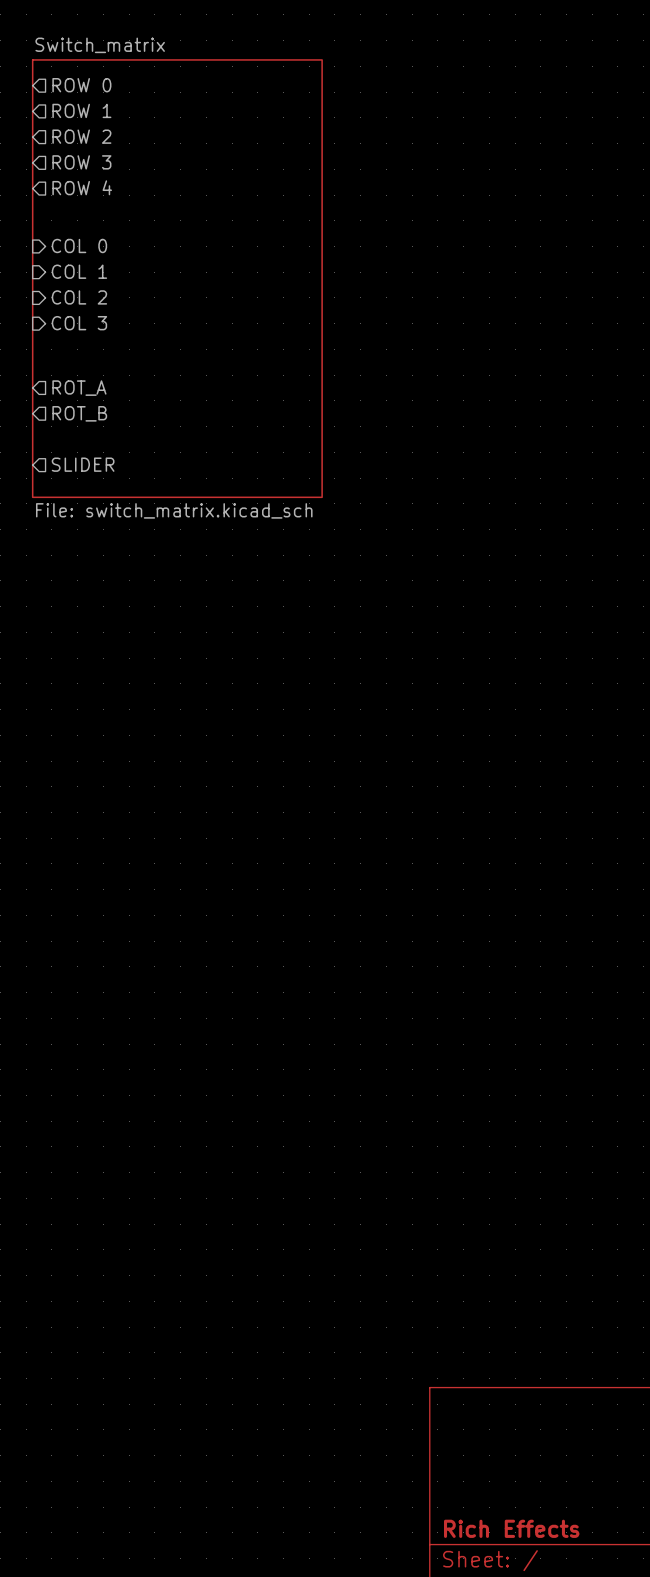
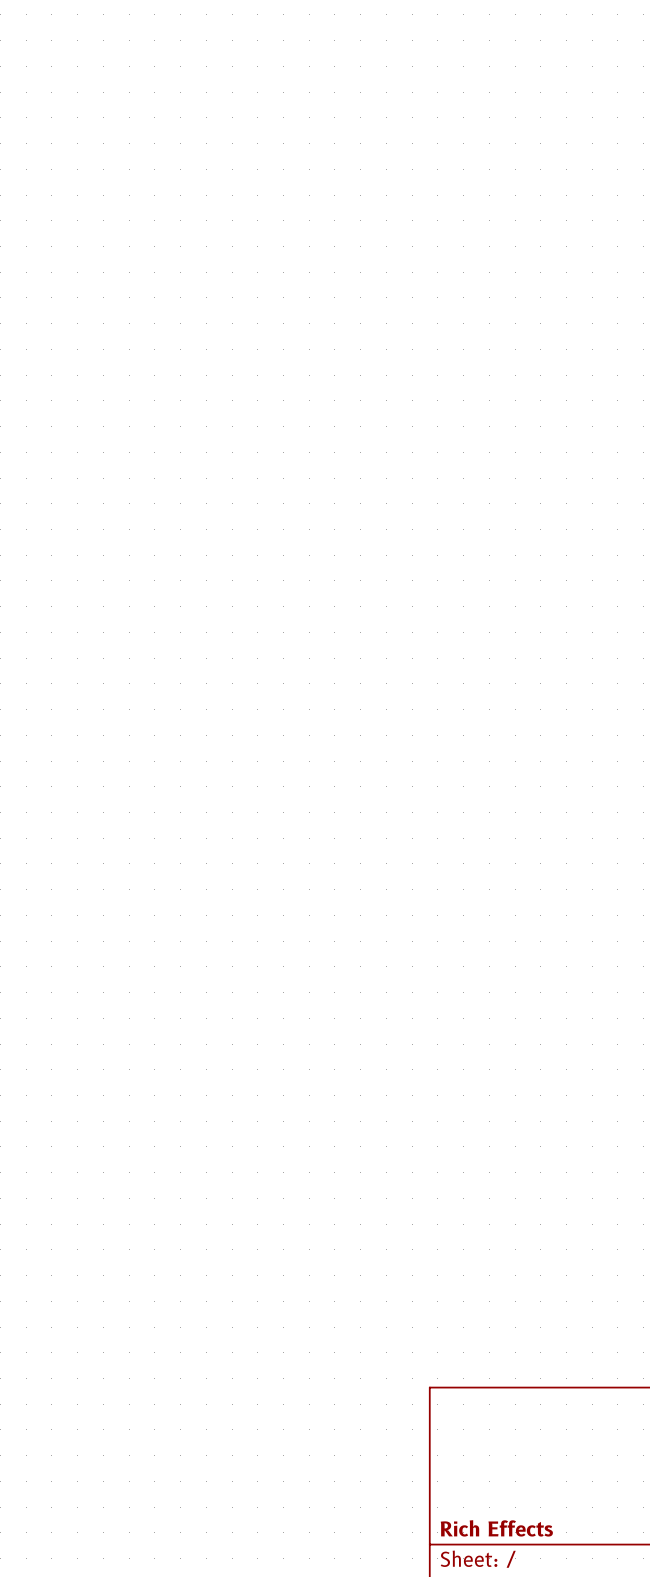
sheet pin: ROW 0 (81, 85) -> none
sheet pin: ROW 1 (81, 110) -> none
sheet pin: ROW 2 (81, 136) -> none
sheet pin: ROW 3 (81, 162) -> none
sheet pin: ROW 4 (82, 187) -> none
sheet pin: COL 0 (79, 245) -> none
sheet pin: COL 1 (79, 271) -> none
sheet Switch_matrix: File: switch_matrix.kicad_sch (177, 278) -> none
sheet pin: COL 2 (79, 297) -> none
sheet pin: COL 3 (79, 323) -> none
sheet pin: ROT_A (79, 388) -> none
sheet pin: ROT_B (79, 413) -> none
sheet pin: SLIDER (83, 464) -> none

